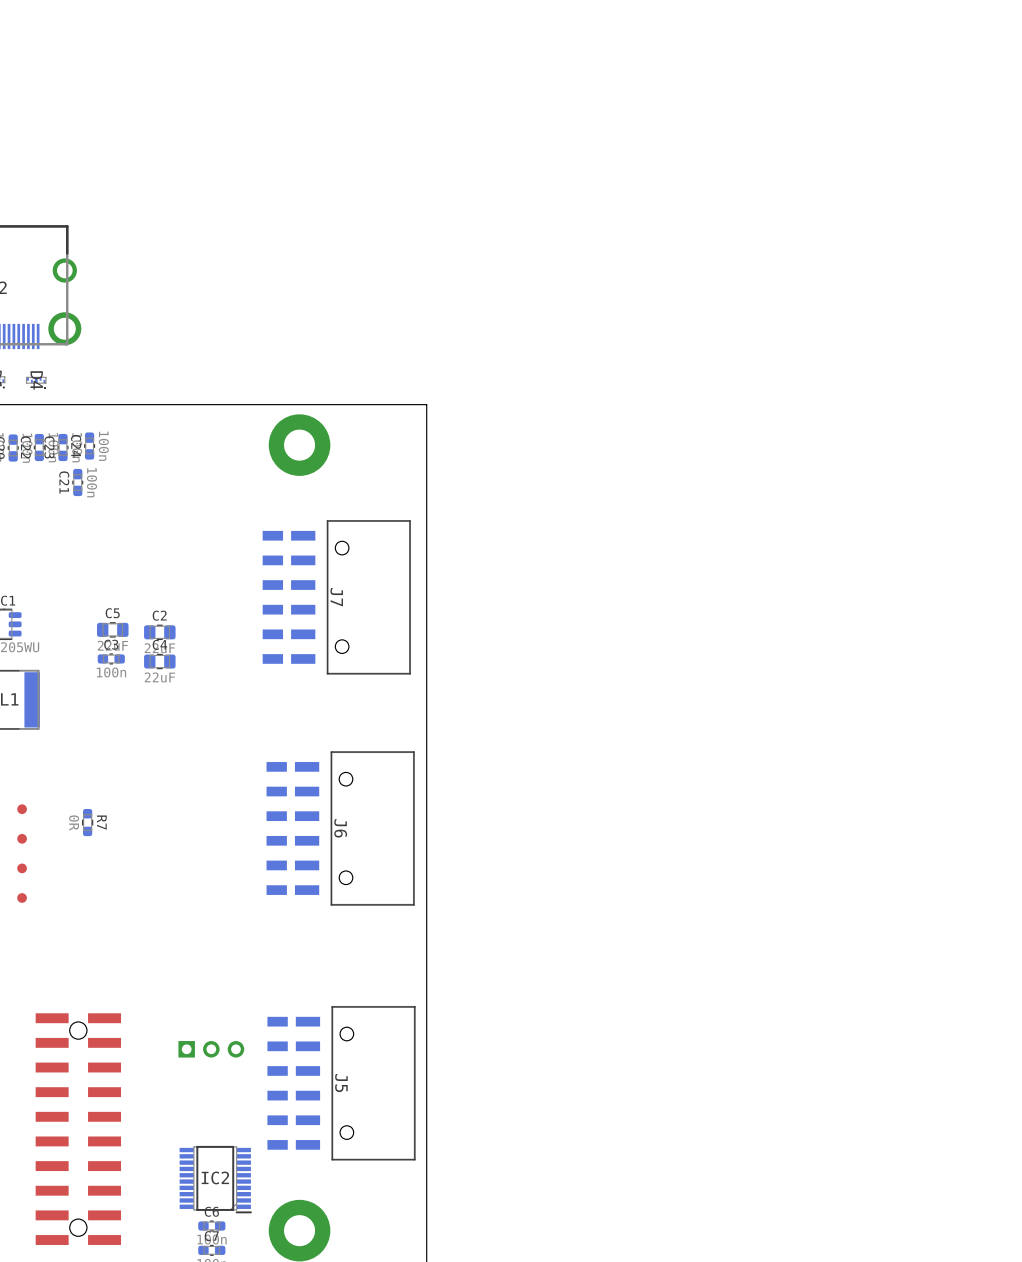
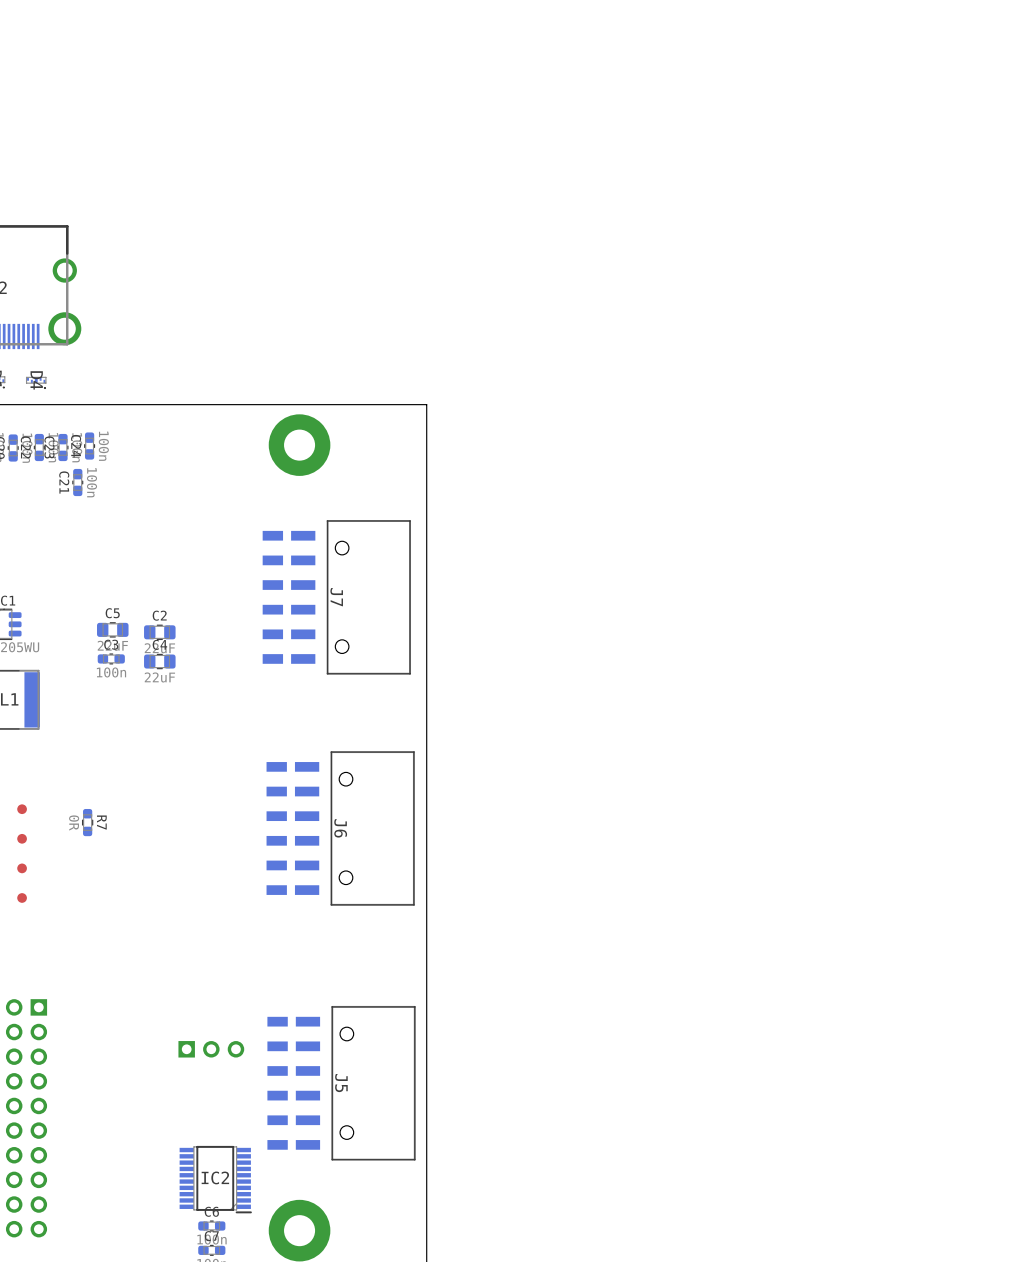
part: none -> (26, 1118)
part: (78, 1129) -> none

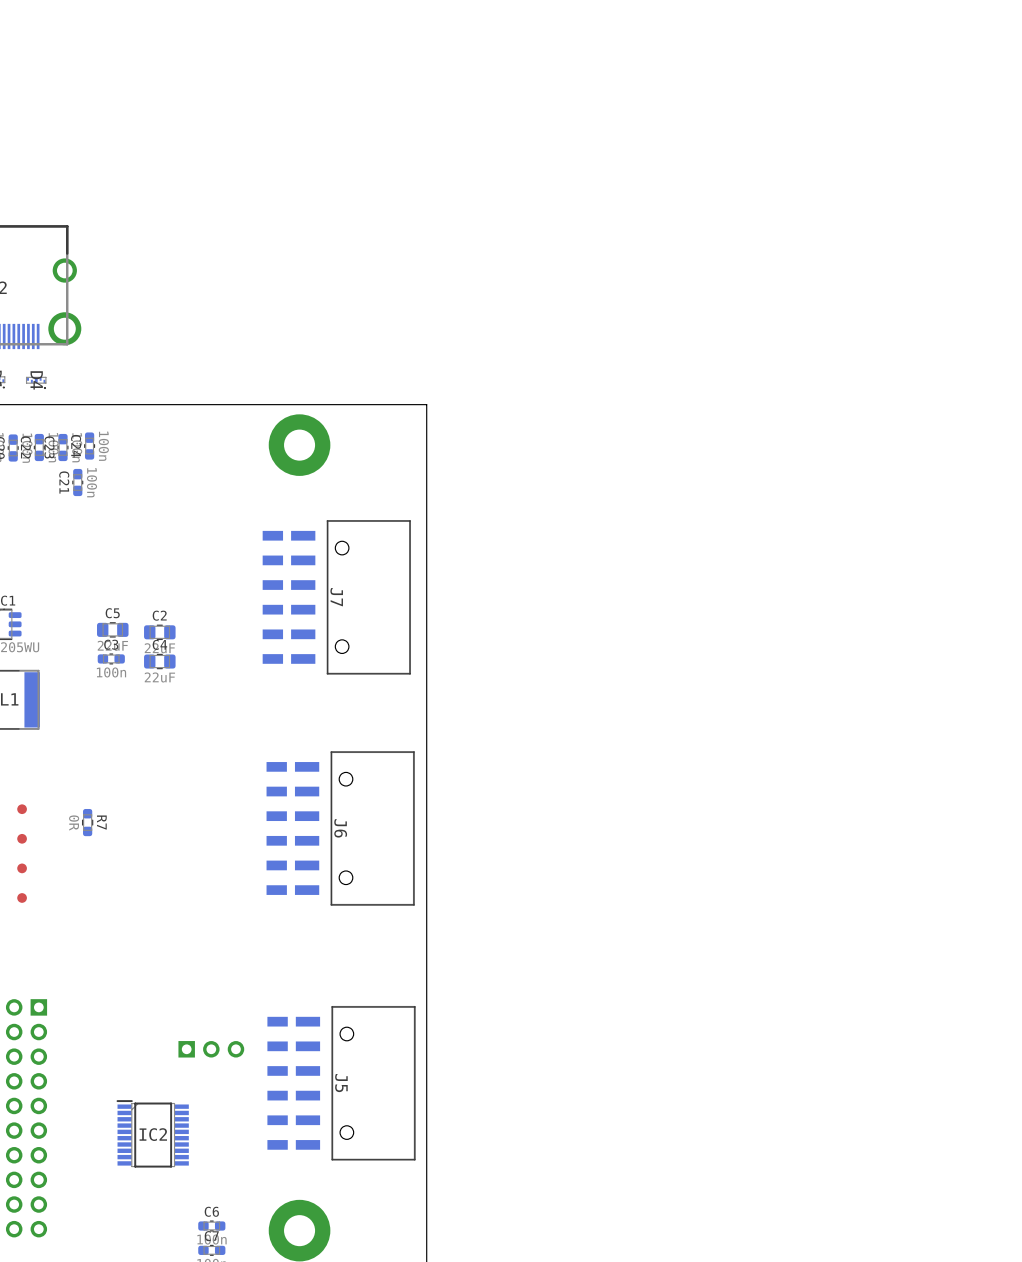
IC2 rotation: 0° (215, 1179) -> 180° (152, 1133)
IC2 position: (215, 1179) -> (152, 1133)

